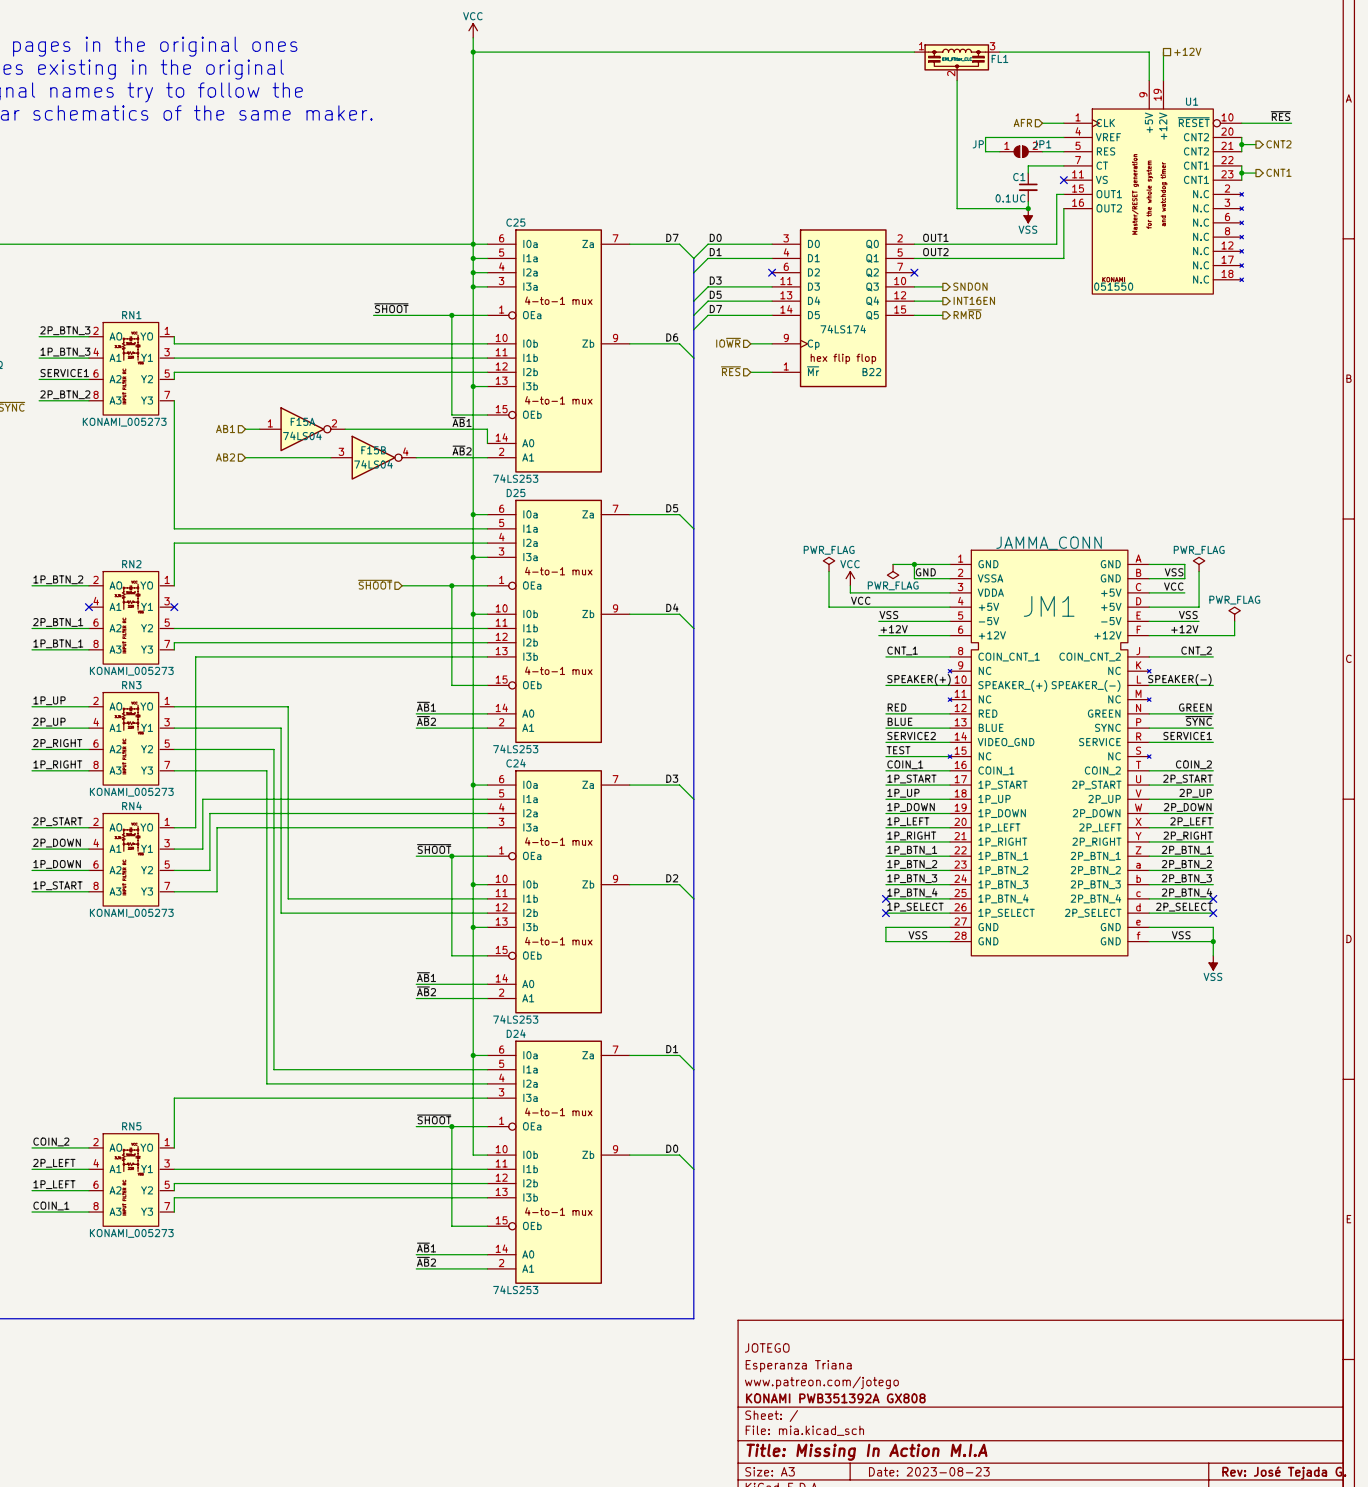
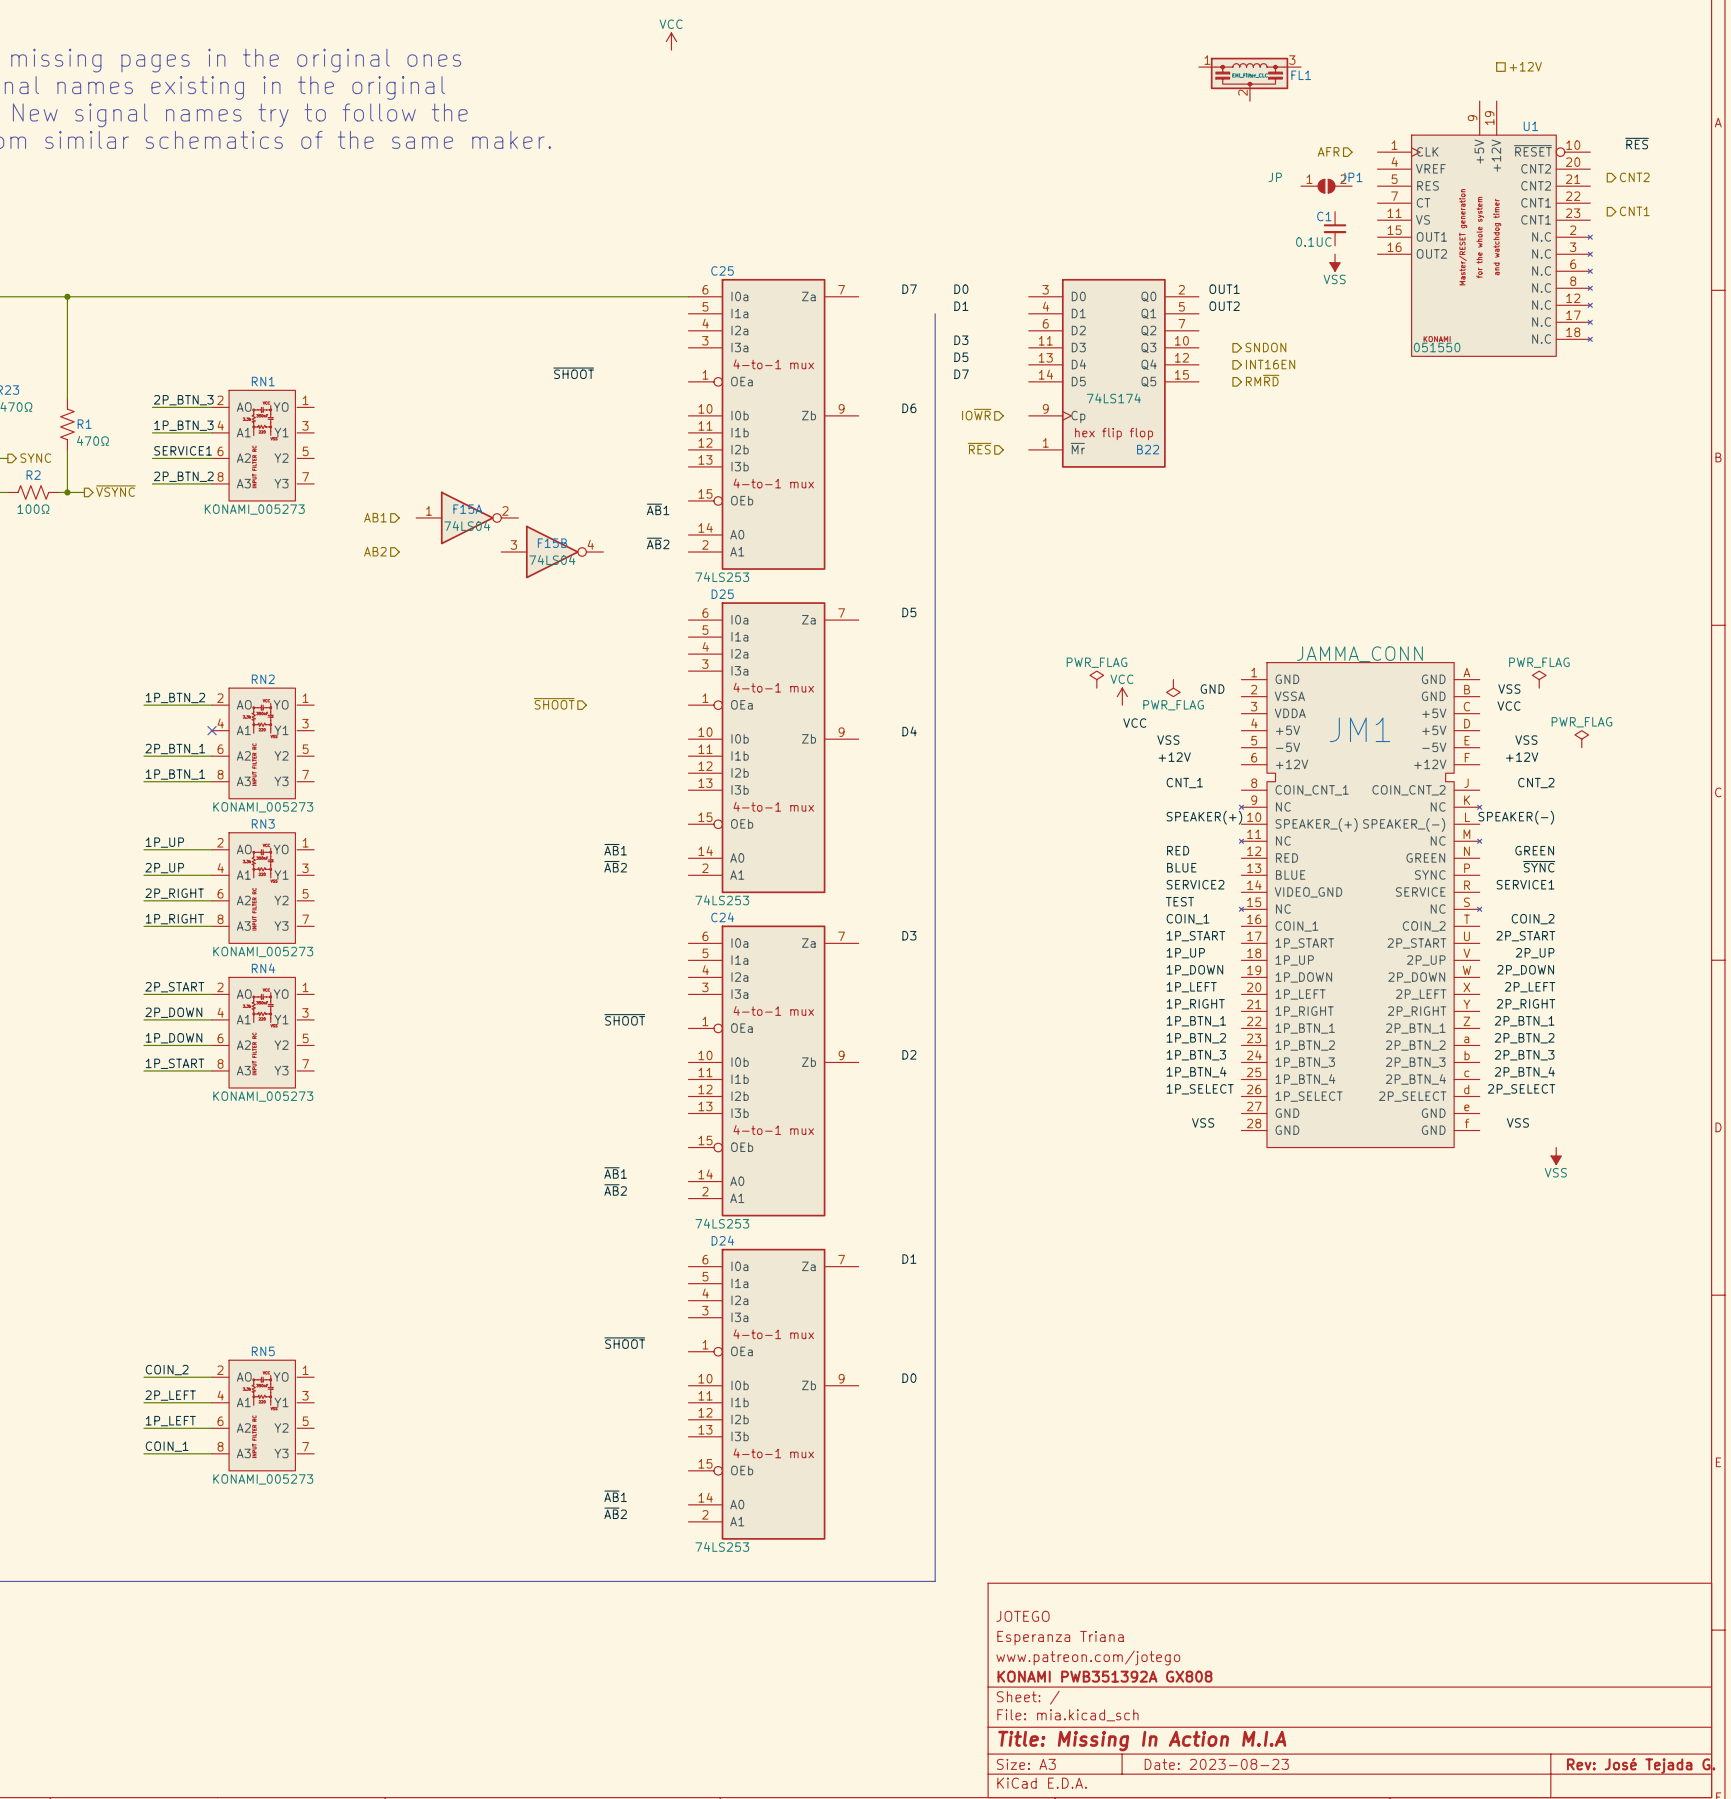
wire: (473, 37) (473, 1155) (487, 1155) -> none
wire: (473, 52) (914, 52) -> none
junction: (473, 52) -> none
wire: (999, 52) (1149, 52) (1149, 80) -> none
wire: (1163, 52) (1163, 80) -> none
wire: (957, 80) (957, 208) (1028, 208) (1028, 201) -> none
wire: (1042, 123) (1063, 123) -> none
wire: (1241, 123) (1291, 123) -> none
wire: (1063, 137) (985, 137) (985, 151) (999, 151) -> none
wire: (1241, 137) (1241, 151) -> none
wire: (1241, 144) (1255, 144) -> none
junction: (1241, 144) -> none
wire: (1042, 151) (1063, 151) -> none
wire: (1063, 165) (1028, 165) (1028, 173) -> none
wire: (1241, 165) (1241, 180) -> none
wire: (1241, 173) (1255, 173) -> none
junction: (1241, 173) -> none
no-connect mark: (1063, 180) -> none
wire: (1063, 194) (1056, 194) (1056, 244) (914, 244) -> none
junction: (1028, 208) -> none
wire: (1063, 208) (1063, 258) (914, 258) -> none
junction: (473, 244) -> none
wire: (629, 244) (679, 244) (693, 258) (708, 244) (772, 244) -> none
wire: (473, 258) (487, 258) -> none
junction: (473, 258) -> none
wire: (772, 258) (708, 258) (693, 272) -> none
wire: (473, 272) (487, 272) -> none
junction: (473, 272) -> none
no-connect mark: (772, 272) -> none
no-connect mark: (914, 272) -> none
wire: (473, 286) (487, 286) -> none
junction: (473, 286) -> none
wire: (772, 286) (708, 286) (693, 301) -> none
wire: (914, 286) (942, 286) -> none
wire: (772, 301) (708, 301) (693, 315) -> none
wire: (914, 301) (942, 301) -> none
wire: (373, 315) (487, 315) -> none
wire: (451, 315) (451, 415) (487, 415) -> none
junction: (451, 315) -> none
wire: (772, 315) (708, 315) (693, 329) -> none
wire: (914, 315) (942, 315) -> none
wire: (174, 336) (174, 343) (487, 343) -> none
wire: (629, 343) (679, 343) (693, 358) -> none
wire: (750, 343) (772, 343) -> none
wire: (174, 358) (487, 358) -> none
wire: (487, 372) (174, 372) (174, 379) -> none
wire: (750, 372) (772, 372) -> none
wire: (473, 386) (487, 386) -> none
junction: (473, 386) -> none
wire: (174, 400) (174, 528) (487, 528) -> none
wire: (245, 429) (259, 429) -> none
wire: (345, 429) (487, 429) (487, 443) -> none
wire: (245, 457) (330, 457) -> none
wire: (416, 457) (487, 457) -> none
wire: (473, 514) (487, 514) -> none
junction: (473, 514) -> none
wire: (629, 514) (679, 514) (693, 528) -> none
wire: (487, 543) (174, 543) (174, 585) -> none
wire: (473, 557) (487, 557) -> none
junction: (473, 557) -> none
wire: (893, 564) (949, 564) -> none
wire: (914, 564) (914, 578) (949, 578) -> none
junction: (914, 564) -> none
wire: (1149, 564) (1184, 564) (1184, 578) (1149, 578) -> none
wire: (829, 571) (829, 607) (949, 607) -> none
wire: (1199, 571) (1199, 607) (1149, 607) -> none
wire: (402, 585) (487, 585) -> none
wire: (451, 585) (451, 685) (487, 685) -> none
junction: (451, 585) -> none
wire: (850, 585) (850, 592) (949, 592) -> none
wire: (1149, 592) (1184, 592) -> none
no-connect mark: (174, 607) -> none
wire: (473, 614) (487, 614) -> none
junction: (473, 614) -> none
wire: (629, 614) (679, 614) (693, 628) -> none
wire: (878, 621) (949, 621) -> none
wire: (1149, 621) (1199, 621) -> none
wire: (1234, 621) (1234, 635) (1149, 635) -> none
wire: (174, 628) (487, 628) -> none
wire: (878, 635) (949, 635) -> none
wire: (487, 642) (174, 642) (174, 649) -> none
wire: (487, 656) (195, 656) (195, 827) (174, 827) -> none
wire: (885, 656) (949, 656) -> none
wire: (1149, 656) (1213, 656) -> none
wire: (885, 685) (949, 685) -> none
wire: (1149, 685) (1213, 685) -> none
wire: (174, 706) (288, 706) (288, 898) (487, 898) -> none
wire: (416, 713) (487, 713) -> none
wire: (885, 713) (949, 713) -> none
wire: (1149, 713) (1213, 713) -> none
wire: (174, 728) (281, 728) (281, 913) (487, 913) -> none
wire: (416, 728) (487, 728) -> none
wire: (885, 728) (949, 728) -> none
wire: (1149, 728) (1213, 728) -> none
wire: (885, 742) (949, 742) -> none
wire: (1149, 742) (1213, 742) -> none
wire: (174, 749) (273, 749) (273, 1069) (487, 1069) -> none
wire: (885, 756) (949, 756) -> none
wire: (174, 770) (266, 770) (266, 1083) (487, 1083) -> none
wire: (885, 770) (949, 770) -> none
wire: (1149, 770) (1213, 770) -> none
wire: (473, 785) (487, 785) -> none
junction: (473, 785) -> none
wire: (629, 785) (679, 785) (693, 799) -> none
wire: (885, 785) (949, 785) -> none
wire: (1149, 785) (1213, 785) -> none
wire: (487, 799) (202, 799) (202, 849) (174, 849) -> none
wire: (885, 799) (949, 799) -> none
wire: (1149, 799) (1213, 799) -> none
wire: (487, 813) (209, 813) (209, 870) (174, 870) -> none
wire: (885, 813) (949, 813) -> none
wire: (1149, 813) (1213, 813) -> none
wire: (487, 827) (217, 827) (217, 891) (174, 891) -> none
wire: (885, 827) (949, 827) -> none
wire: (1149, 827) (1213, 827) -> none
wire: (885, 841) (949, 841) -> none
wire: (1149, 841) (1213, 841) -> none
wire: (416, 856) (487, 856) -> none
wire: (451, 856) (451, 955) (487, 955) -> none
junction: (451, 856) -> none
wire: (885, 856) (949, 856) -> none
wire: (1149, 856) (1213, 856) -> none
wire: (885, 870) (949, 870) -> none
wire: (1149, 870) (1213, 870) -> none
wire: (473, 884) (487, 884) -> none
junction: (473, 884) -> none
wire: (629, 884) (679, 884) (693, 898) -> none
wire: (885, 884) (949, 884) -> none
wire: (1149, 884) (1213, 884) -> none
wire: (885, 898) (949, 898) -> none
no-connect mark: (885, 898) -> none
wire: (1149, 898) (1213, 898) -> none
no-connect mark: (1213, 898) -> none
wire: (885, 913) (949, 913) -> none
no-connect mark: (885, 913) -> none
wire: (1149, 913) (1213, 913) -> none
no-connect mark: (1213, 913) -> none
wire: (473, 927) (487, 927) -> none
junction: (473, 927) -> none
wire: (949, 927) (885, 927) (885, 941) (949, 941) -> none
wire: (1149, 927) (1213, 927) (1213, 955) -> none
wire: (1149, 941) (1213, 941) -> none
junction: (1213, 941) -> none
wire: (416, 984) (487, 984) -> none
wire: (416, 998) (487, 998) -> none
wire: (473, 1055) (487, 1055) -> none
junction: (473, 1055) -> none
wire: (629, 1055) (679, 1055) (693, 1069) -> none
wire: (487, 1098) (174, 1098) (174, 1147) -> none
wire: (416, 1126) (487, 1126) -> none
wire: (451, 1126) (451, 1226) (487, 1226) -> none
junction: (451, 1126) -> none
wire: (629, 1155) (679, 1155) (693, 1169) -> none
wire: (174, 1169) (487, 1169) -> none
wire: (487, 1183) (174, 1183) (174, 1190) -> none
wire: (487, 1197) (174, 1197) (174, 1212) -> none
wire: (416, 1254) (487, 1254) -> none
wire: (416, 1268) (487, 1268) -> none

